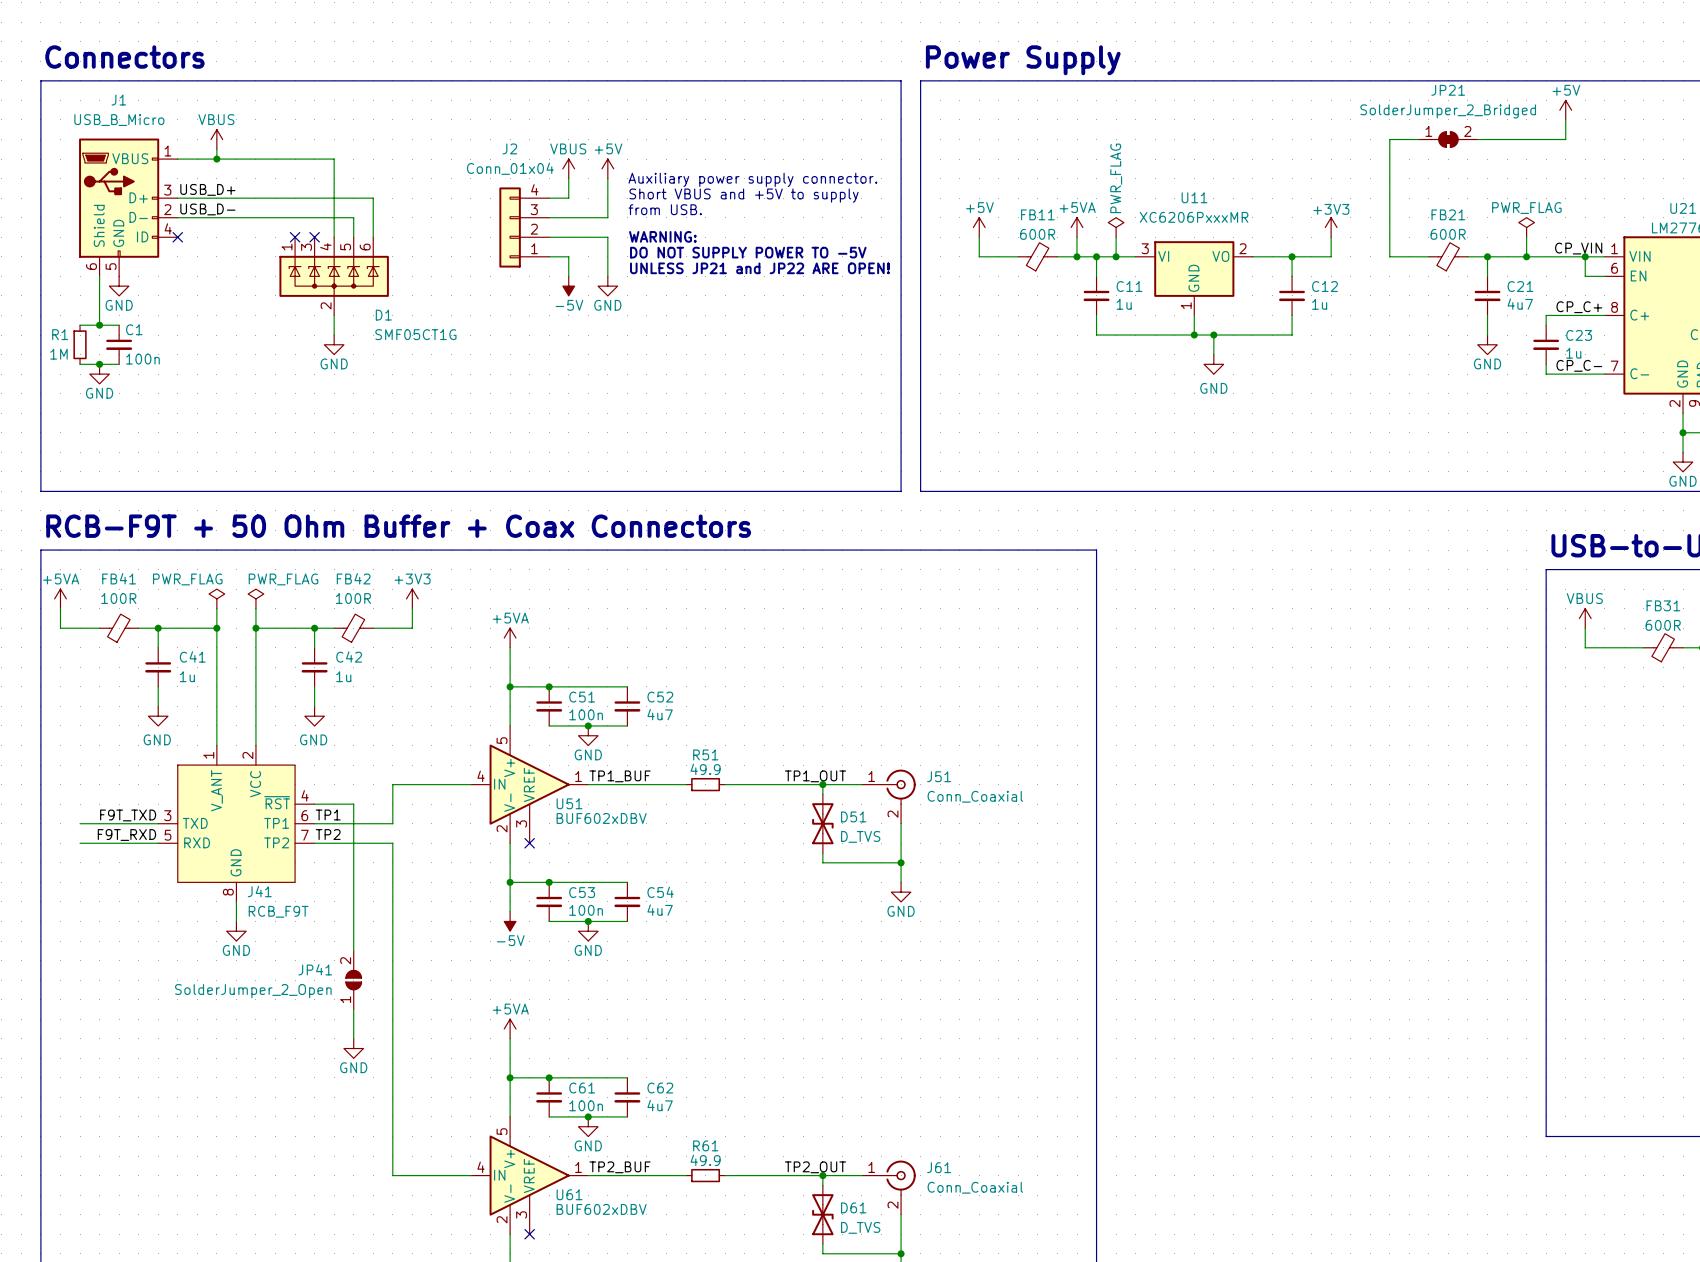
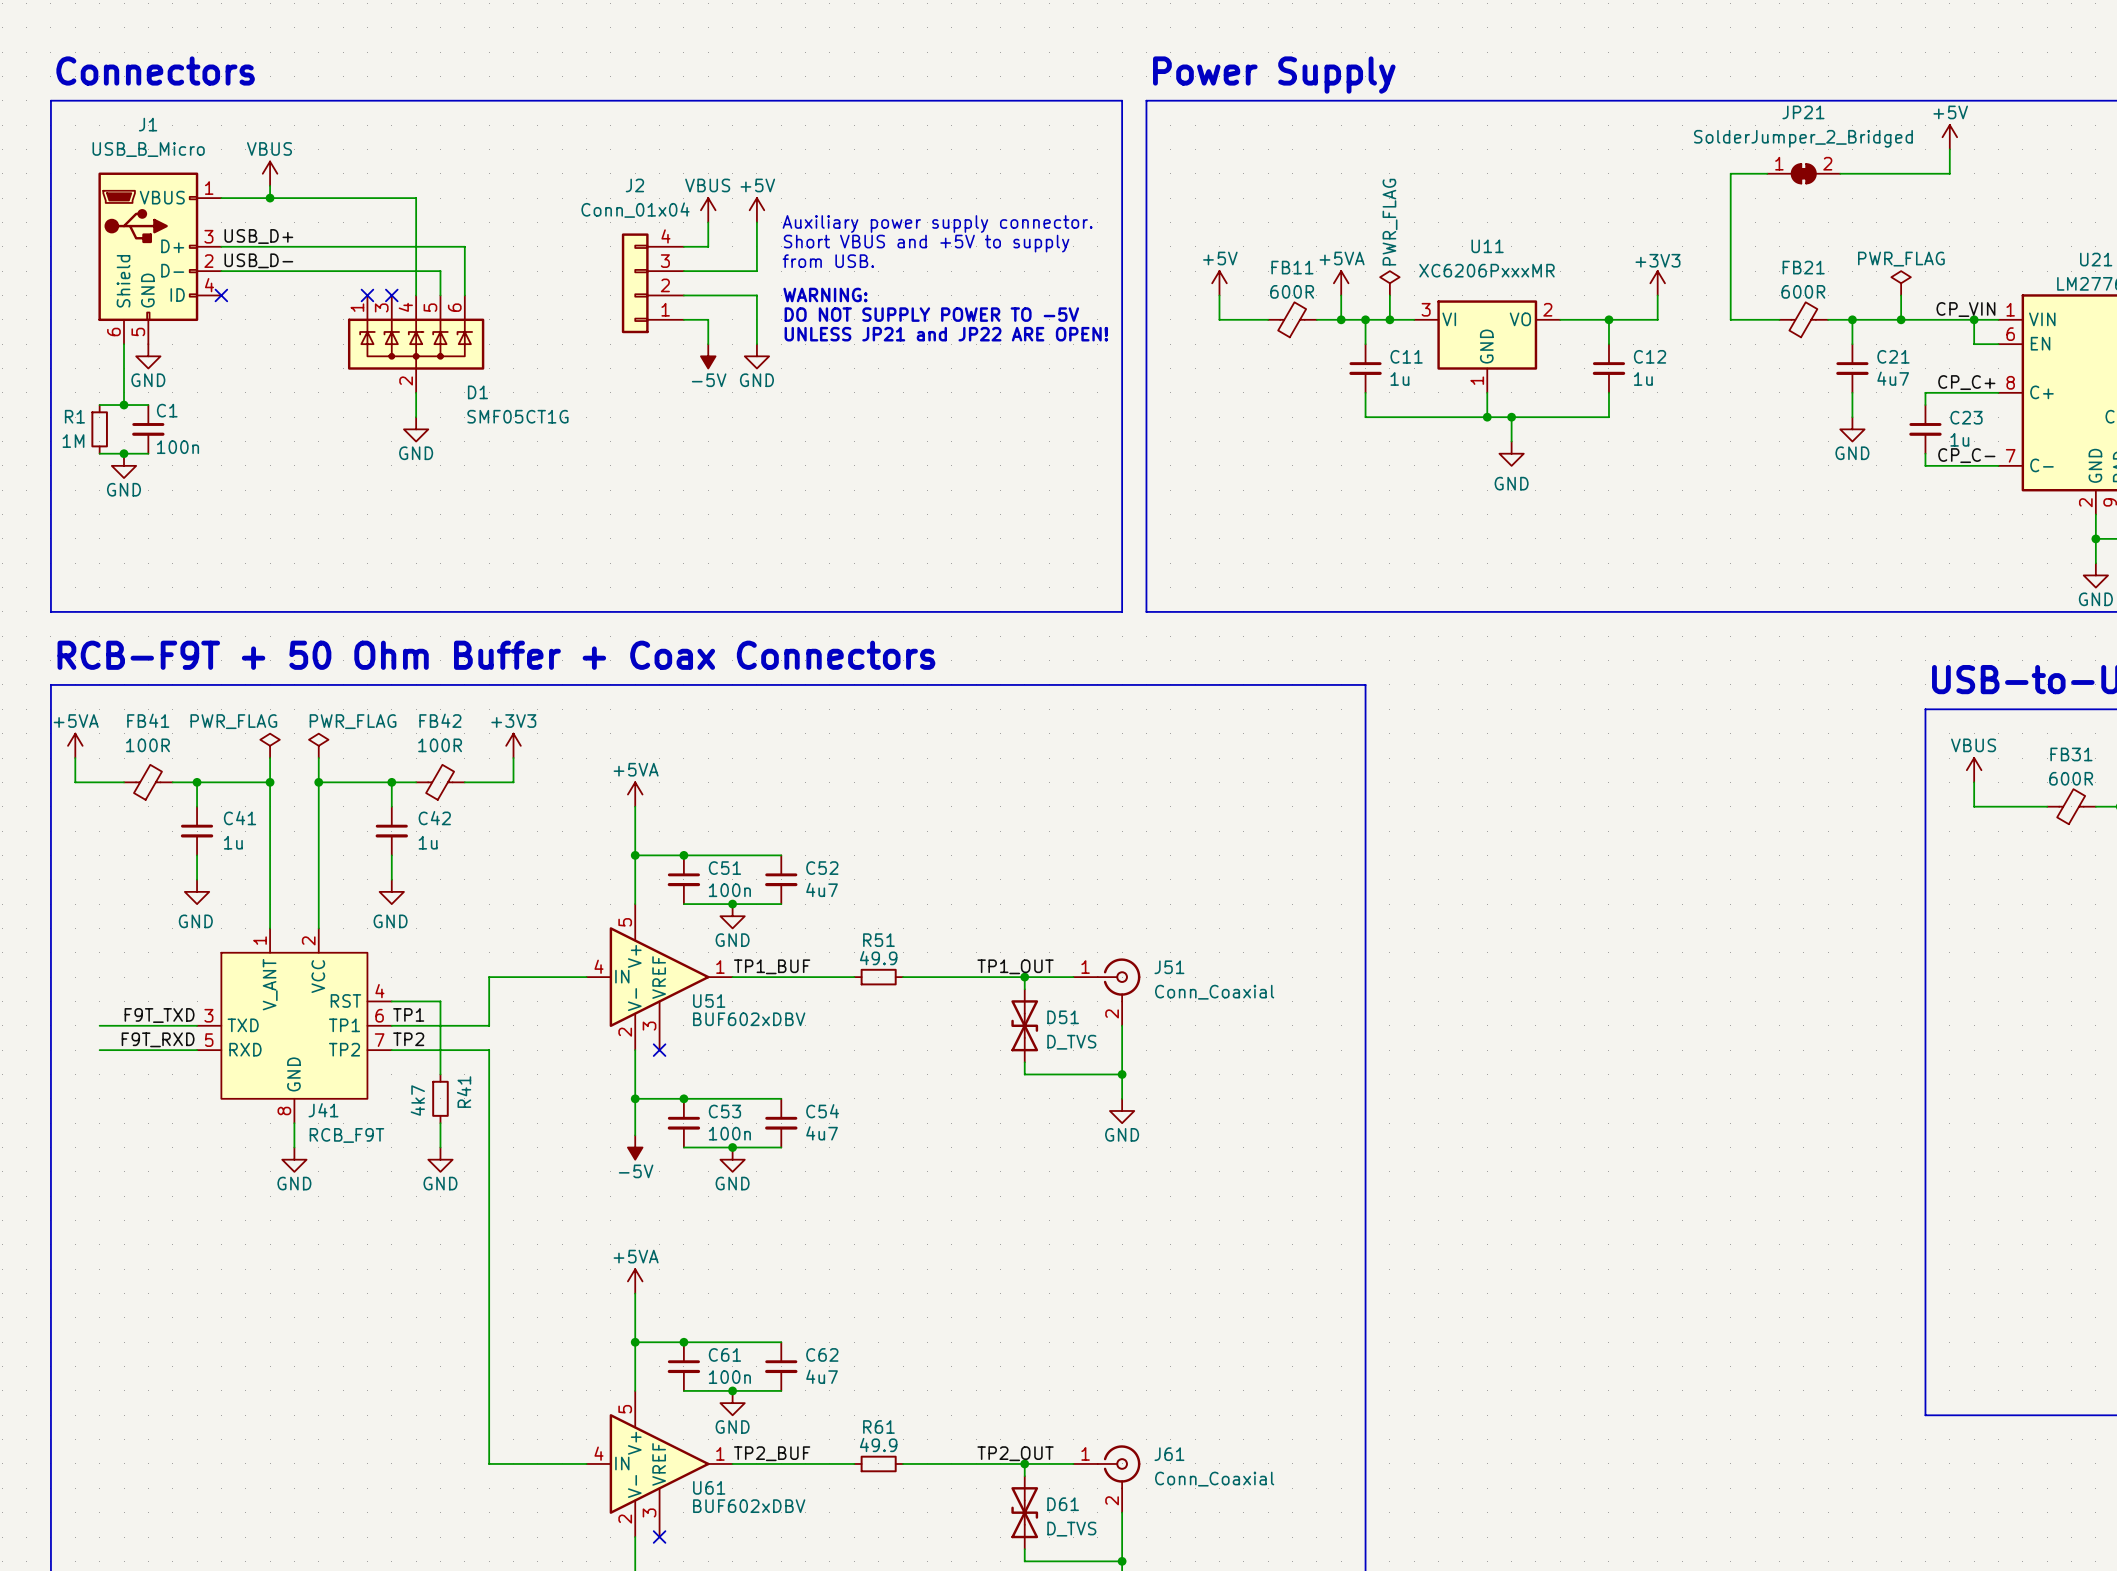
J41 pin name: ~{RST} (277, 802) -> RST (345, 1000)
wire: (353, 862) (353, 901) -> none
R41: none -> 4k7 (440, 1098)
wire: (353, 921) (353, 950) -> none
JP41: SolderJumper_2_Open (353, 980) -> none
wire: (353, 1009) (353, 1038) -> none
power symbol position: GND (353, 1048) -> GND (440, 1159)

